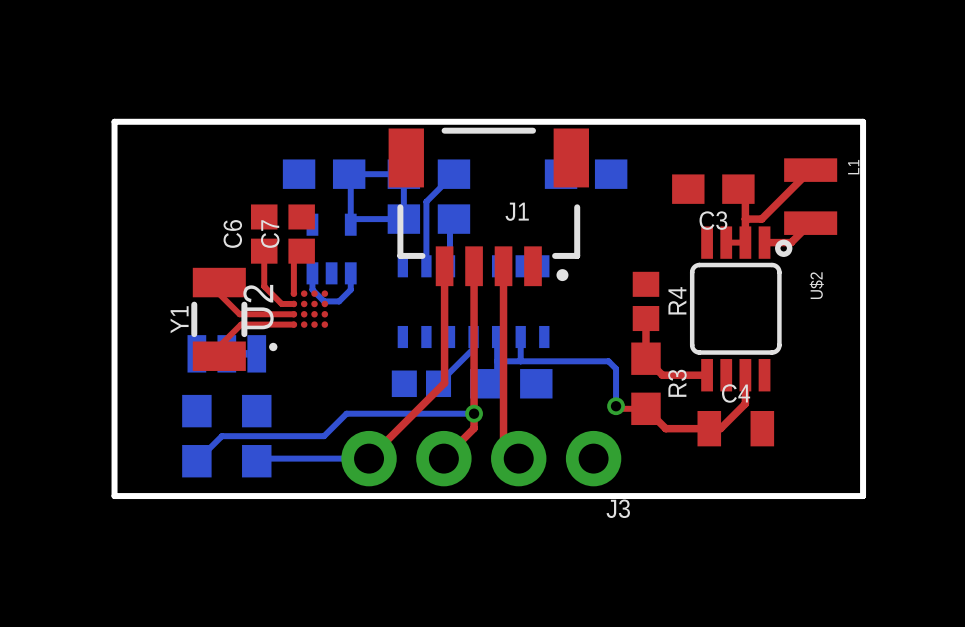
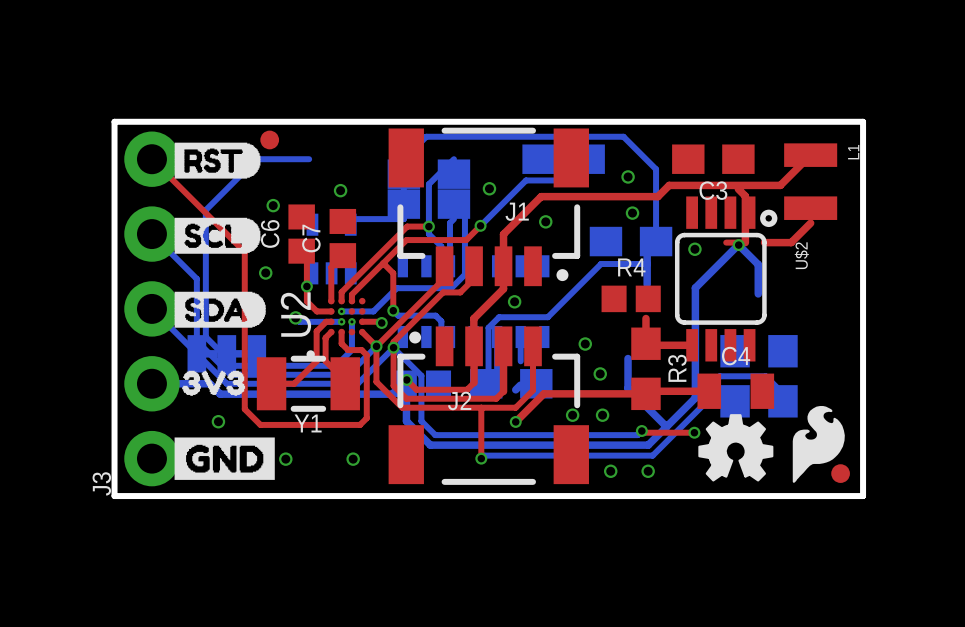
part: none -> (269, 139)
drawing: none -> [174, 142, 261, 179]
top track: none -> (810, 155) (780, 185) (669, 185) (657, 196) (541, 196) (503, 234) (503, 266)
top track: none -> (151, 159) (244, 252) (244, 409) (260, 424) (360, 424) (366, 418) (366, 355) (361, 350) (348, 350) (341, 343) (341, 332)
bottom track: none -> (309, 159) (256, 159) (205, 210) (205, 337) (234, 365) (336, 365) (351, 350) (351, 321)
bottom track: none -> (453, 159) (428, 184) (428, 234) (441, 246) (441, 266)
bottom track: none -> (588, 159) (567, 180) (525, 180) (480, 225)
top track: (810, 170) (761, 219) (745, 219) -> none
part: (324, 174) -> none
bottom track: (403, 174) (349, 174) (350, 175) (350, 224) -> (403, 174) (403, 159) (426, 136) (623, 136) (656, 169) (656, 241) (647, 250) (647, 284)
bottom track: (453, 174) (426, 201) (426, 266) -> none
part position: (586, 174) -> (563, 159)
via: none -> (628, 176)
via: none -> (489, 188)
C3 position: (713, 189) -> (713, 159)
via: none -> (340, 190)
L1 position: (810, 196) -> (810, 181)
bottom track: none -> (453, 204) (464, 215) (464, 274) (451, 288) (396, 288) (373, 311) (341, 311)
via: none -> (273, 205)
via: none -> (632, 213)
drawing: none -> [174, 217, 261, 254]
part position: (428, 219) -> (428, 204)
via: none -> (545, 221)
top track: none -> (480, 225) (466, 240) (406, 240) (351, 294) (351, 301)
via: none -> (480, 225)
top track: none -> (428, 226) (407, 226) (341, 292) (341, 301)
via: none -> (428, 226)
bottom track: none -> (151, 234) (196, 278) (196, 341) (230, 374) (348, 374) (376, 346)
C6: (264, 234) -> none
C7 name: C7 (270, 234) -> C6 (270, 233)
C7: none -> (342, 238)
part: none -> (631, 241)
bottom track: none -> (738, 245) (695, 287) (695, 397) (648, 445) (430, 445) (406, 421) (406, 395) (398, 387)
bottom track: none -> (738, 245) (758, 264) (758, 293)
via: none -> (738, 245)
via: none -> (694, 249)
top track: (264, 251) (264, 286) (281, 303) (293, 303) -> none
top track: (301, 251) (293, 258) (293, 293) -> none
top track: none -> (302, 255) (306, 259) (306, 301) (316, 311) (331, 311)
top track: none -> (342, 255) (331, 267) (331, 301)
top track: none -> (383, 263) (393, 273) (393, 310)
bottom track: none -> (647, 264) (601, 264) (547, 317) (499, 317) (488, 327) (488, 371) (475, 383)
via: none -> (265, 272)
bottom track: (312, 273) (312, 289) (324, 301) (339, 301) (350, 289) (350, 273) -> none
top track: (444, 278) (444, 383) (369, 458) -> (444, 278) (376, 346)
top track: (474, 278) (474, 346) -> (474, 278) (460, 292) (443, 292) (393, 342) (393, 385) (406, 398) (496, 398) (503, 391)
top track: (219, 282) (219, 293) (239, 314) (293, 314) -> none
via: none -> (306, 286)
top track: (503, 288) (503, 346) -> (503, 288) (473, 318) (473, 346)
drawing: none -> [174, 291, 266, 328]
via: none -> (514, 301)
R4 rotation: 0° (645, 301) -> 90° clockwise (631, 298)
bottom track: none -> (151, 308) (226, 383) (357, 383) (393, 347) (421, 375) (421, 421) (435, 435) (637, 435) (641, 431)
U$2 position: (741, 308) -> (726, 278)
bottom track: none -> (393, 310) (398, 315) (435, 315) (441, 321) (441, 337)
via: none -> (393, 310)
via: none -> (341, 311)
bottom track: none -> (295, 317) (299, 321) (341, 321)
via: none -> (295, 317)
Y1 rotation: 0° (219, 319) -> 90° clockwise (308, 383)
Y1 position: (219, 319) -> (308, 383)
U2 position: (298, 320) -> (336, 328)
top track: none -> (331, 321) (326, 321) (316, 331) (316, 361) (294, 383) (271, 383)
via: none -> (341, 321)
via: none -> (351, 321)
top track: none -> (362, 321) (381, 322)
via: none -> (381, 322)
top track: (293, 324) (241, 324) (219, 346) (219, 356) -> none
top track: none -> (331, 332) (325, 337) (325, 361) (345, 380) (345, 383)
top track: none -> (362, 332) (376, 346)
bottom track: (473, 337) (473, 348) (438, 383) -> none
top track: (645, 343) (645, 358) (662, 375) (707, 375) -> (645, 343) (692, 345)
via: none -> (585, 344)
top track: none -> (376, 346) (376, 381) (402, 407) (515, 407) (533, 390) (533, 346)
via: none -> (376, 346)
via: none -> (393, 347)
bottom track: none -> (628, 358) (628, 388) (666, 426)
bottom track: (497, 361) (608, 361) (616, 368) (616, 406) -> none
drawing: none -> [182, 370, 246, 396]
via: none -> (600, 373)
top track: (745, 375) (745, 403) (720, 428) (665, 428) (645, 408) (618, 408) (616, 406) -> none
part: none -> (735, 376)
part: none -> (782, 376)
bottom track: none -> (406, 379) (392, 394) (220, 394) (209, 383) (151, 383)
via: none -> (406, 379)
top track: (474, 382) (474, 428) (443, 458) -> (474, 382) (467, 389) (416, 389) (406, 379)
R3 position: (645, 383) -> (645, 368)
bottom track: none -> (520, 385) (515, 389)
top track: (503, 391) (503, 443) (518, 458) -> none
top track: none -> (709, 391) (648, 391) (645, 393) (543, 393) (515, 421)
bottom track: none -> (782, 401) (782, 393) (765, 376) (719, 376) (705, 390) (705, 402) (652, 455) (484, 455) (481, 458)
J2: none -> (488, 405)
via position: (616, 406) -> (602, 415)
drawing: none -> [698, 406, 845, 483]
top track: none -> (481, 407) (481, 458)
bottom track: (474, 413) (346, 413) (324, 436) (221, 436) (196, 461) -> none
via: (474, 413) -> none
via: none -> (572, 415)
via: none -> (218, 421)
via: none -> (515, 421)
C4 position: (735, 428) -> (735, 391)
J3 footprint: [341, 430, 622, 487] -> [124, 131, 180, 487]
top track: none -> (641, 431) (643, 432) (694, 432)
via: none -> (641, 431)
via: none -> (694, 432)
part: (196, 436) -> none
part: (256, 436) -> none
drawing: none -> [174, 437, 275, 480]
bottom track: (369, 458) (259, 458) (256, 461) -> none
via: none -> (481, 458)
via: none -> (285, 459)
via: none -> (353, 459)
via: none -> (610, 471)
via: none -> (648, 471)
part: none -> (840, 473)
J3 name position: J3 (618, 508) -> J3 (101, 483)

